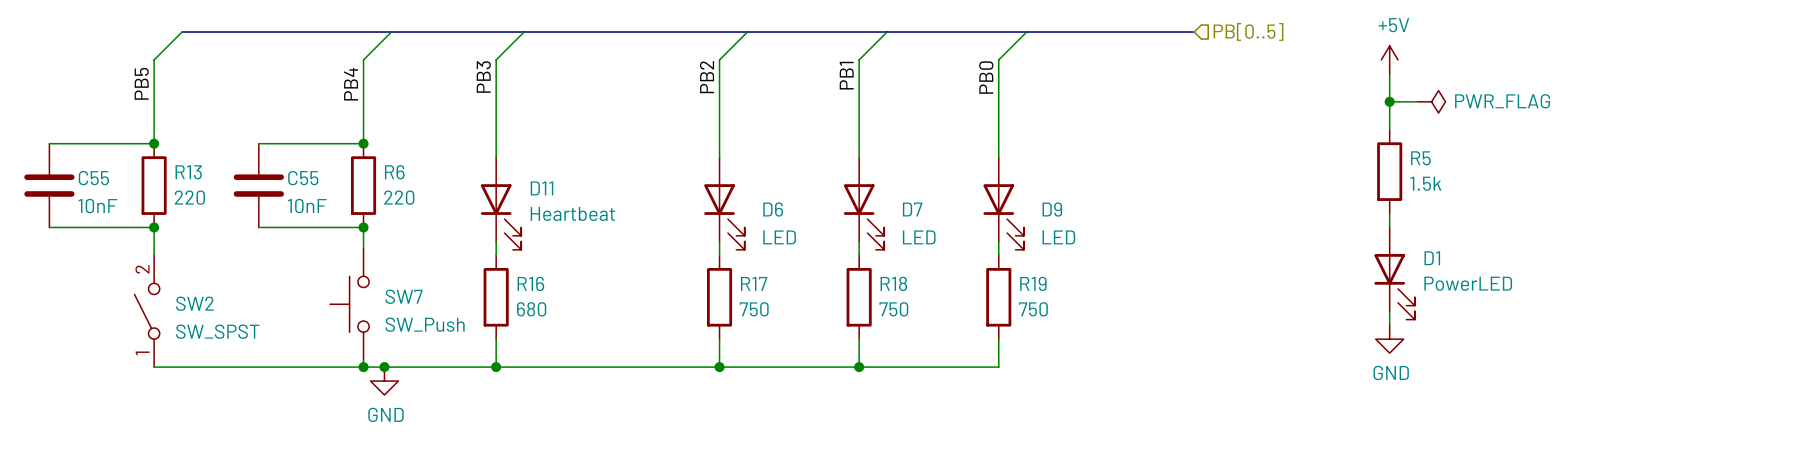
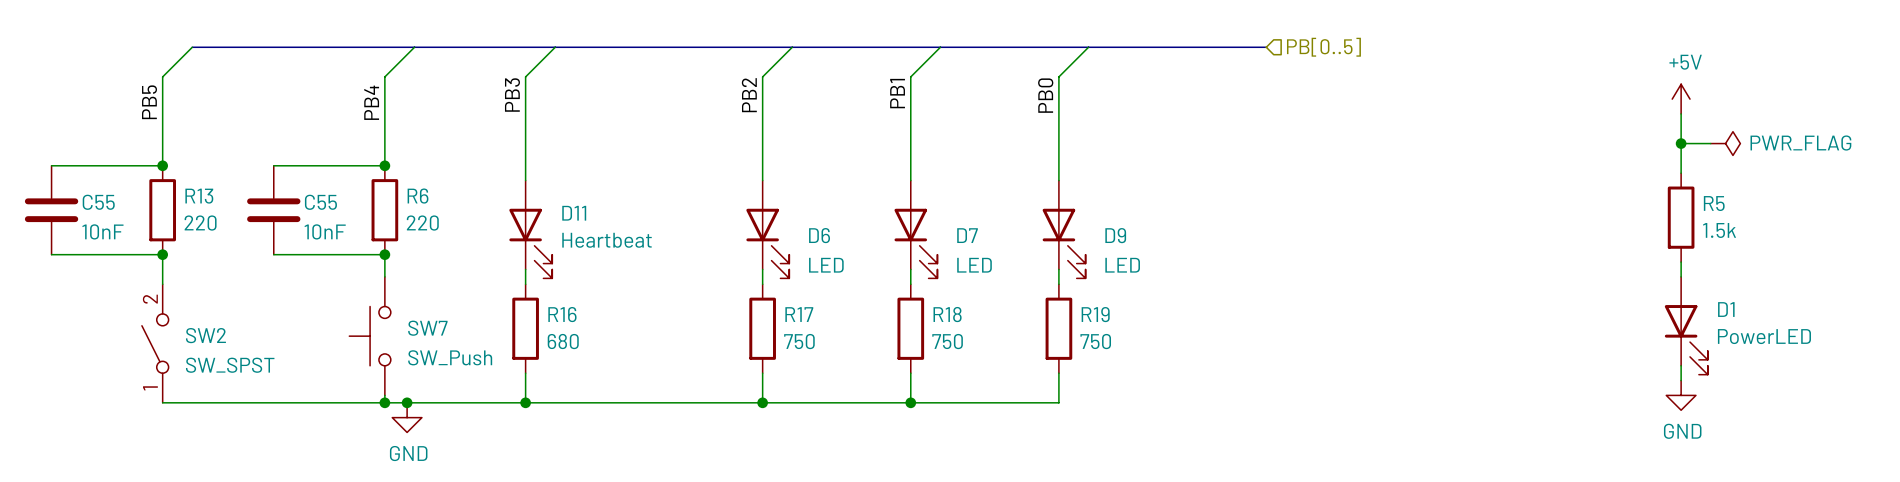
power symbol position: +5V (1389, 59) -> +5V (1681, 99)
wire: (1389, 73) (1389, 129) -> (1681, 113) (1681, 173)
wire: (1389, 101) (1417, 101) -> (1681, 143) (1710, 143)
junction: (1389, 101) -> none
power symbol position: PWR_FLAG (1431, 101) -> PWR_FLAG (1725, 143)
junction: none -> (1681, 143)
R5 position: (1389, 171) -> (1681, 217)
wire: (1389, 213) (1389, 227) -> (1681, 262) (1681, 276)
D1 position: (1394, 273) -> (1686, 325)
wire: (1389, 311) (1389, 325) -> (1681, 365) (1681, 380)
power symbol position: GND (1389, 339) -> GND (1681, 395)

